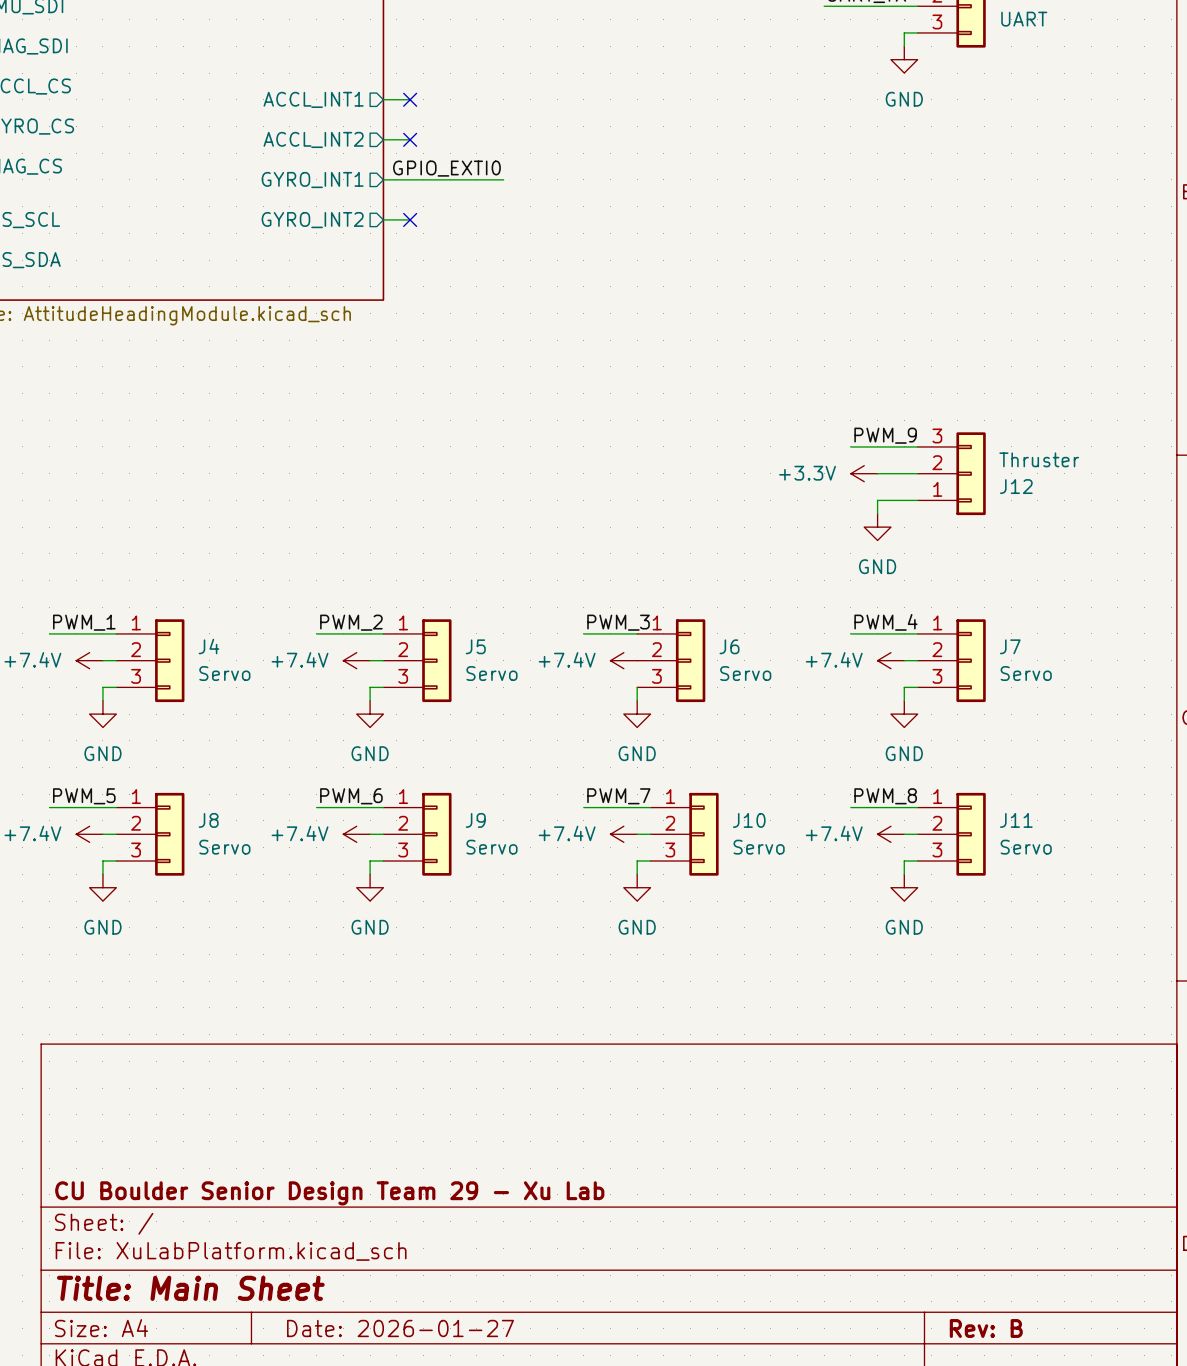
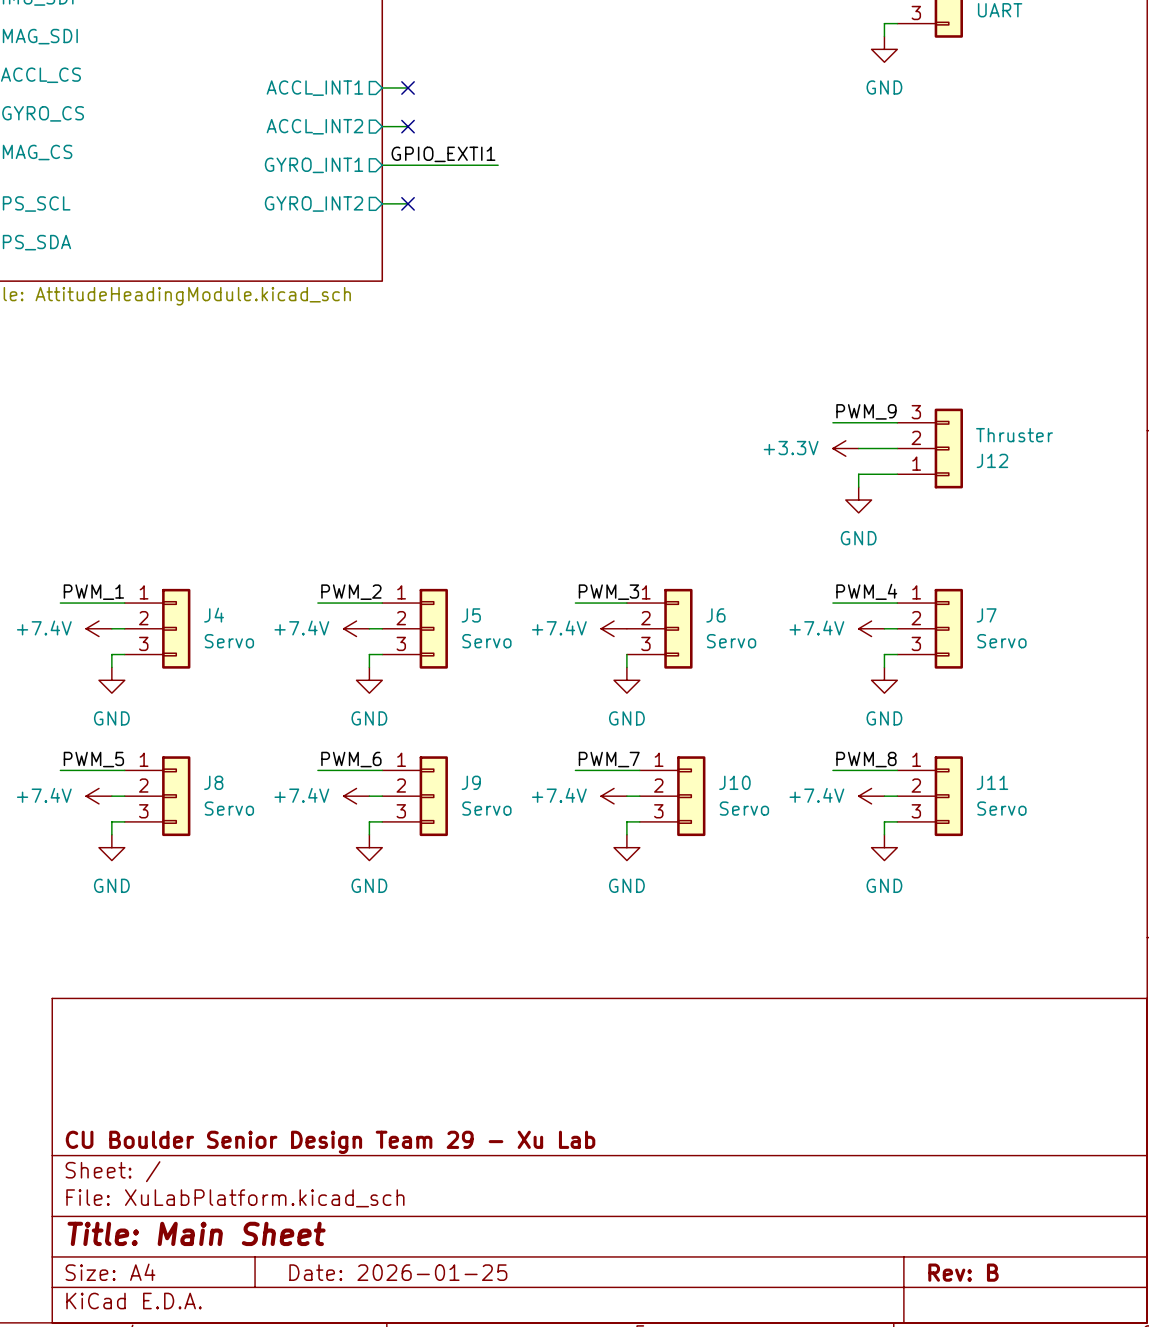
label: GPIO_EXTI0 (446, 168) -> GPIO_EXTI1 (443, 154)
title block: Date: 2026-01-27 (400, 1328) -> Date: 2026-01-25 (398, 1272)

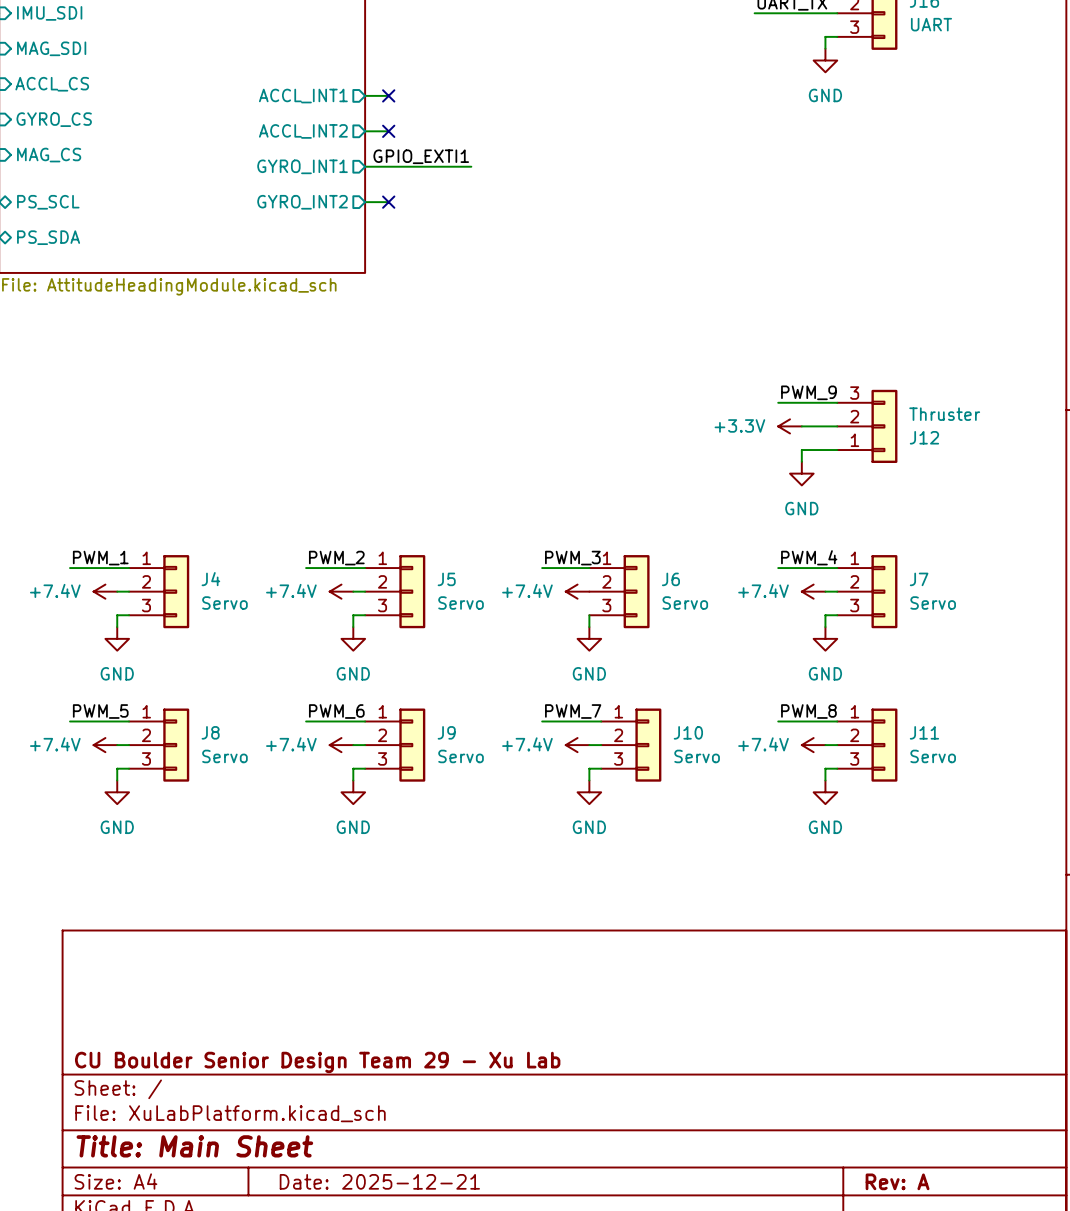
title block: Date: 2026-01-25 (398, 1272) -> Date: 2025-12-21 (379, 1181)
title block: Rev: B (963, 1272) -> Rev: A (897, 1181)

